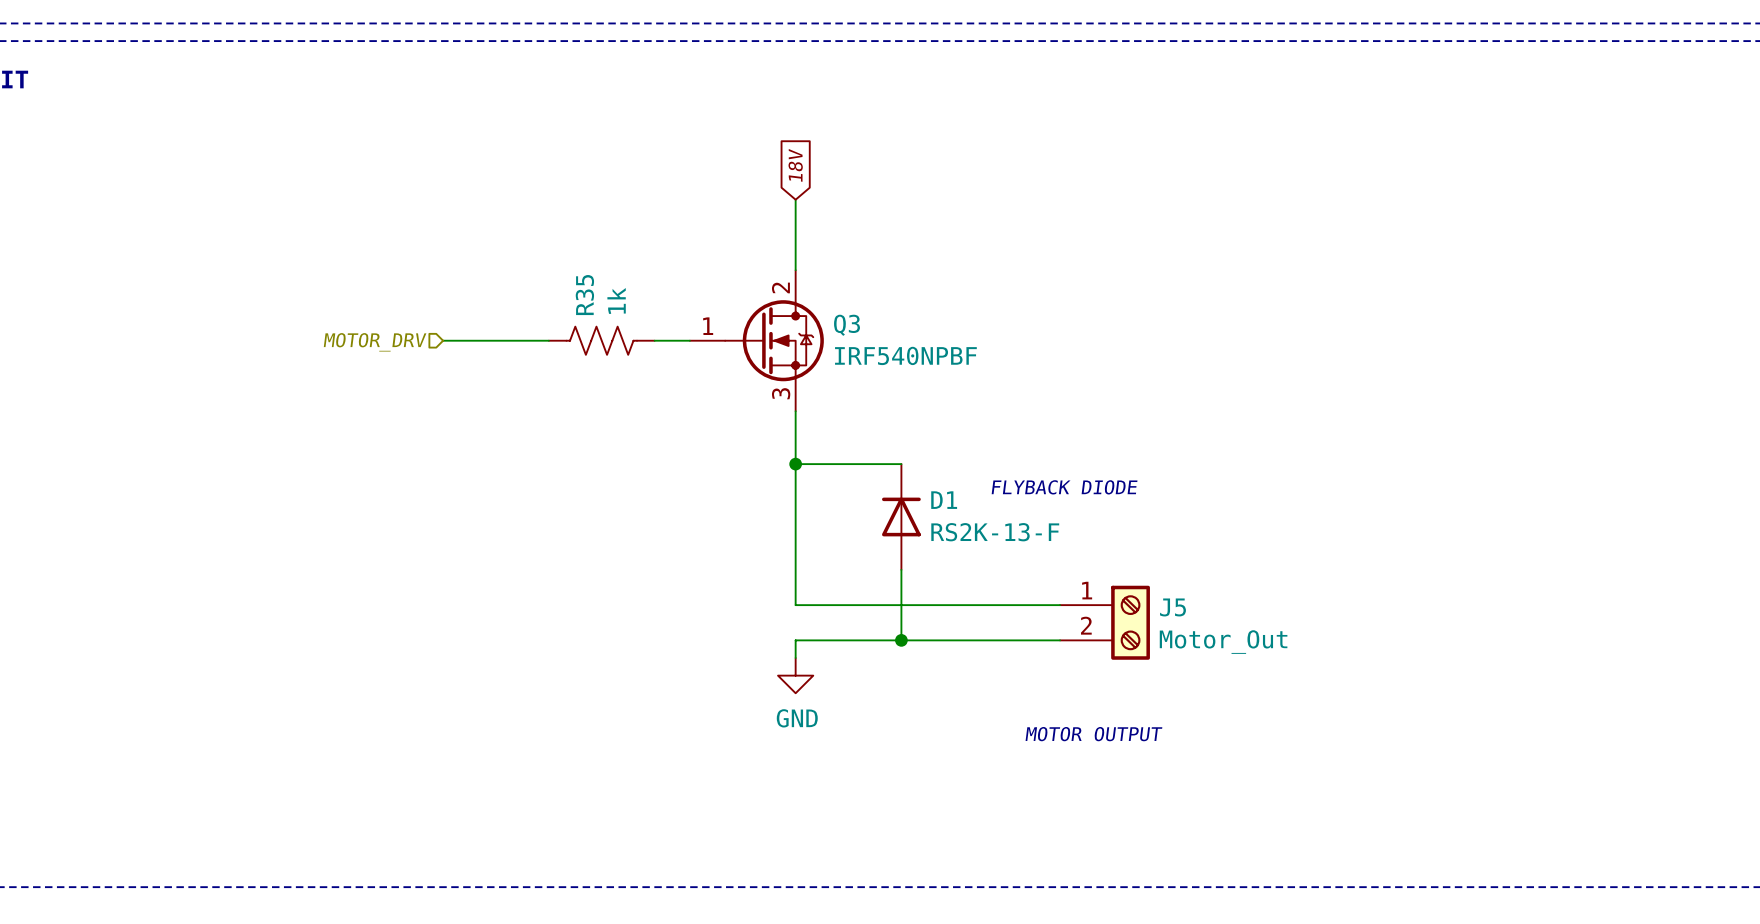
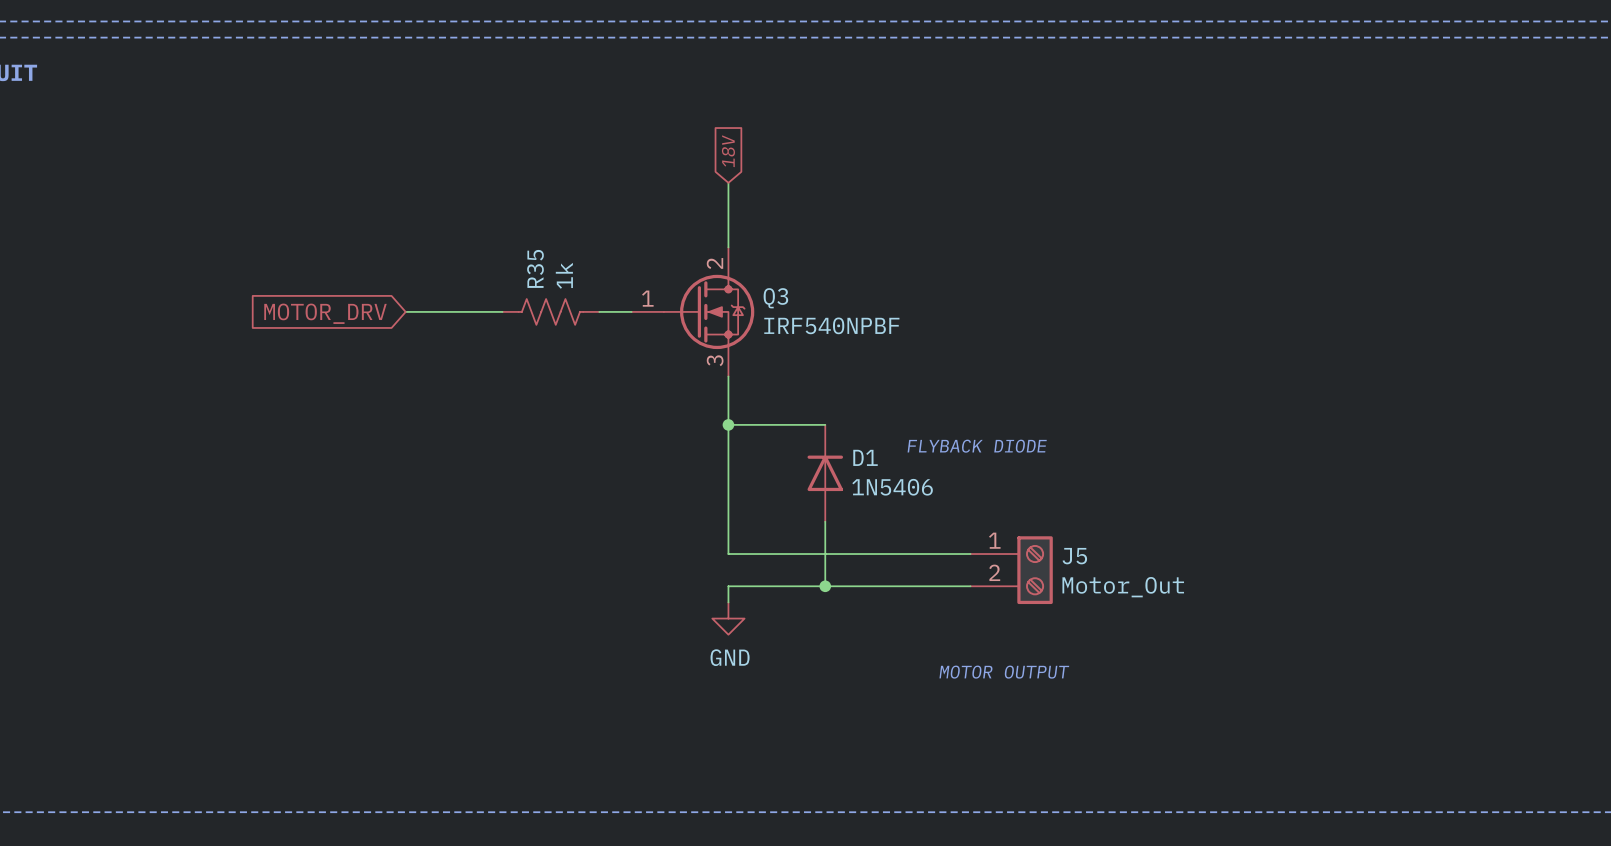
hierarchical label: MOTOR_DRV (375, 342) -> none
global label: none -> MOTOR_DRV (325, 313)
D1 value: RS2K-13-F (995, 532) -> 1N5406 (892, 487)

